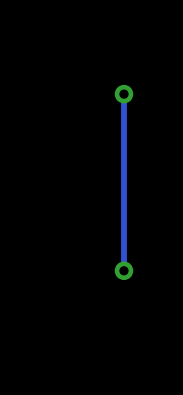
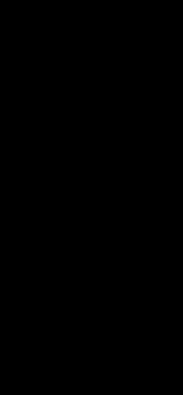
track: (123, 94) (123, 270) -> none
via: (123, 94) -> none
via: (123, 270) -> none

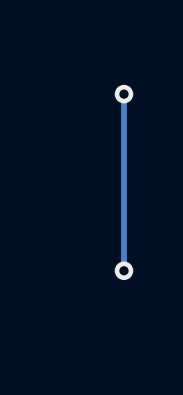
track: none -> (123, 94) (123, 270)
via: none -> (123, 94)
via: none -> (123, 270)

